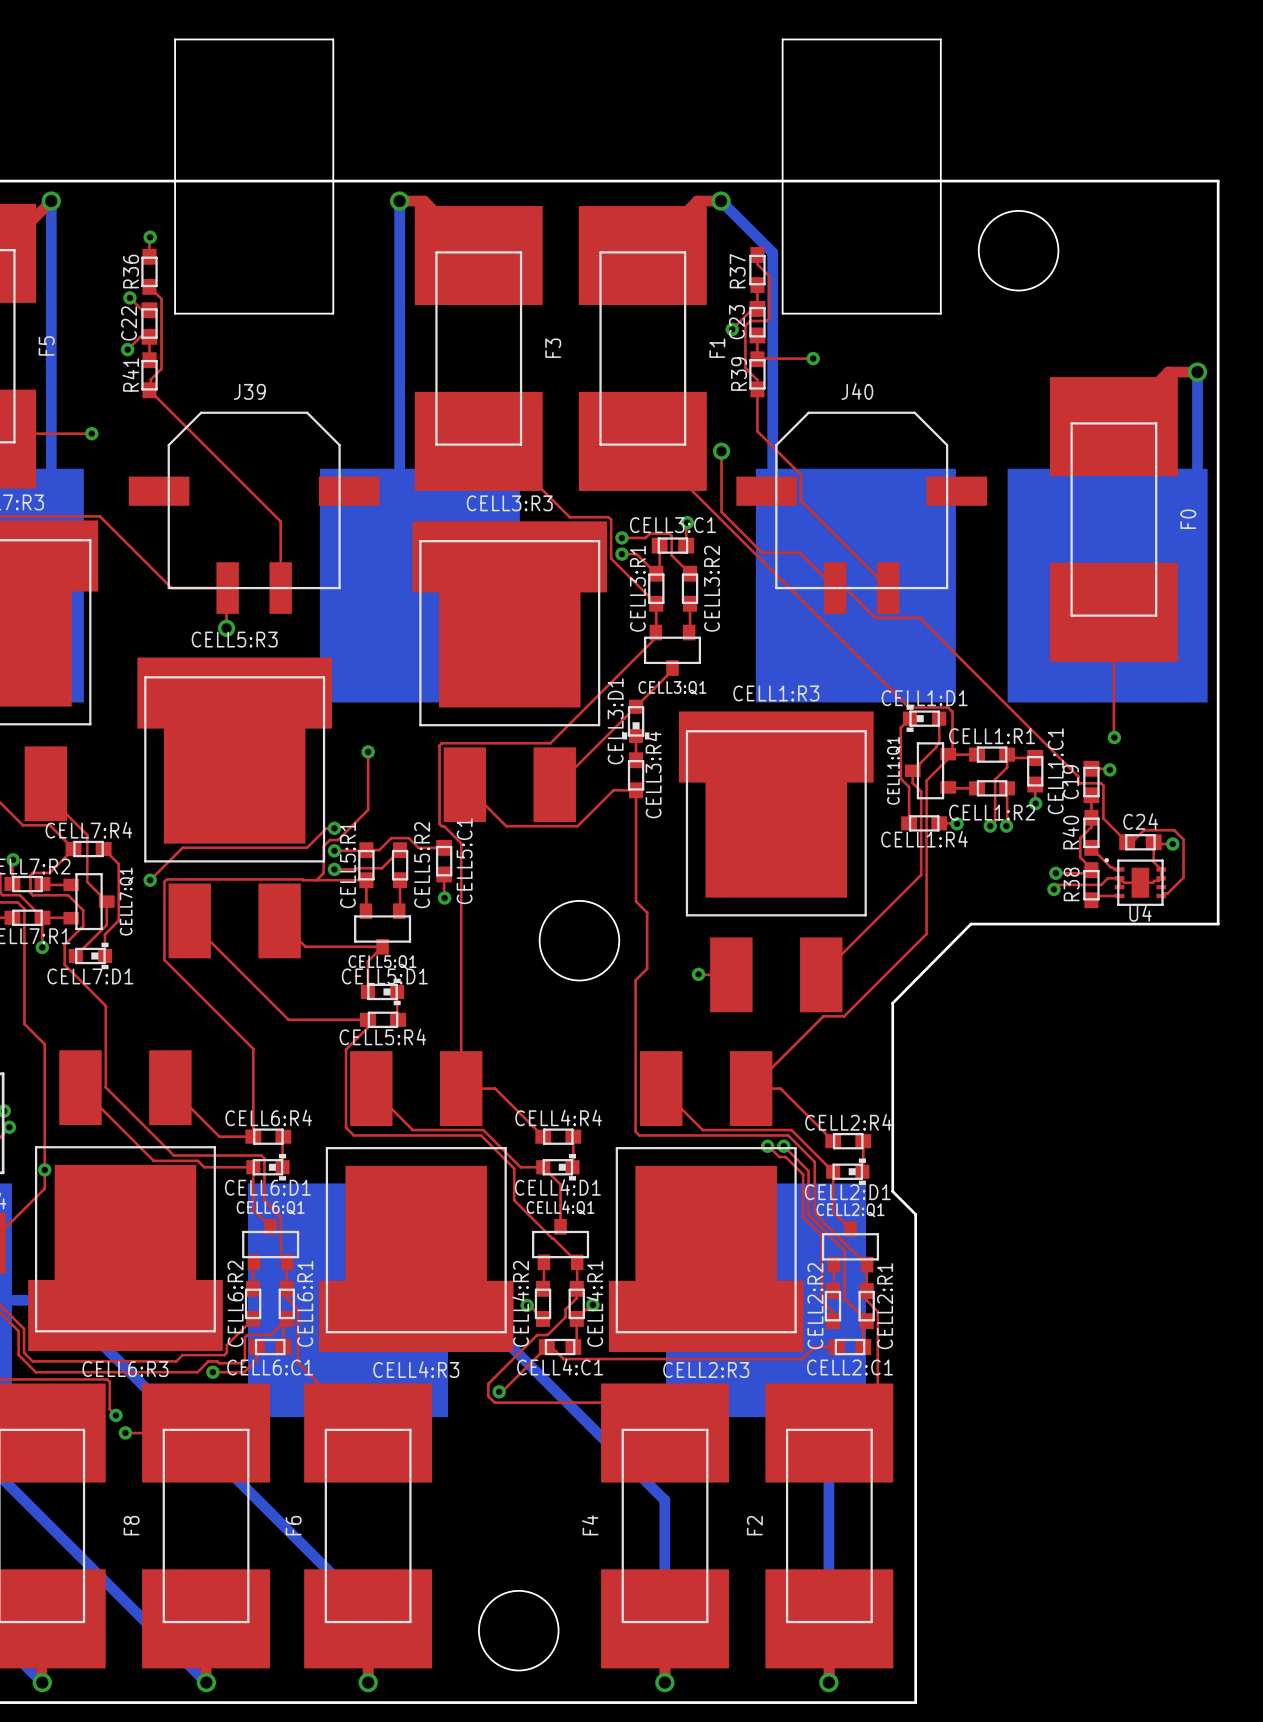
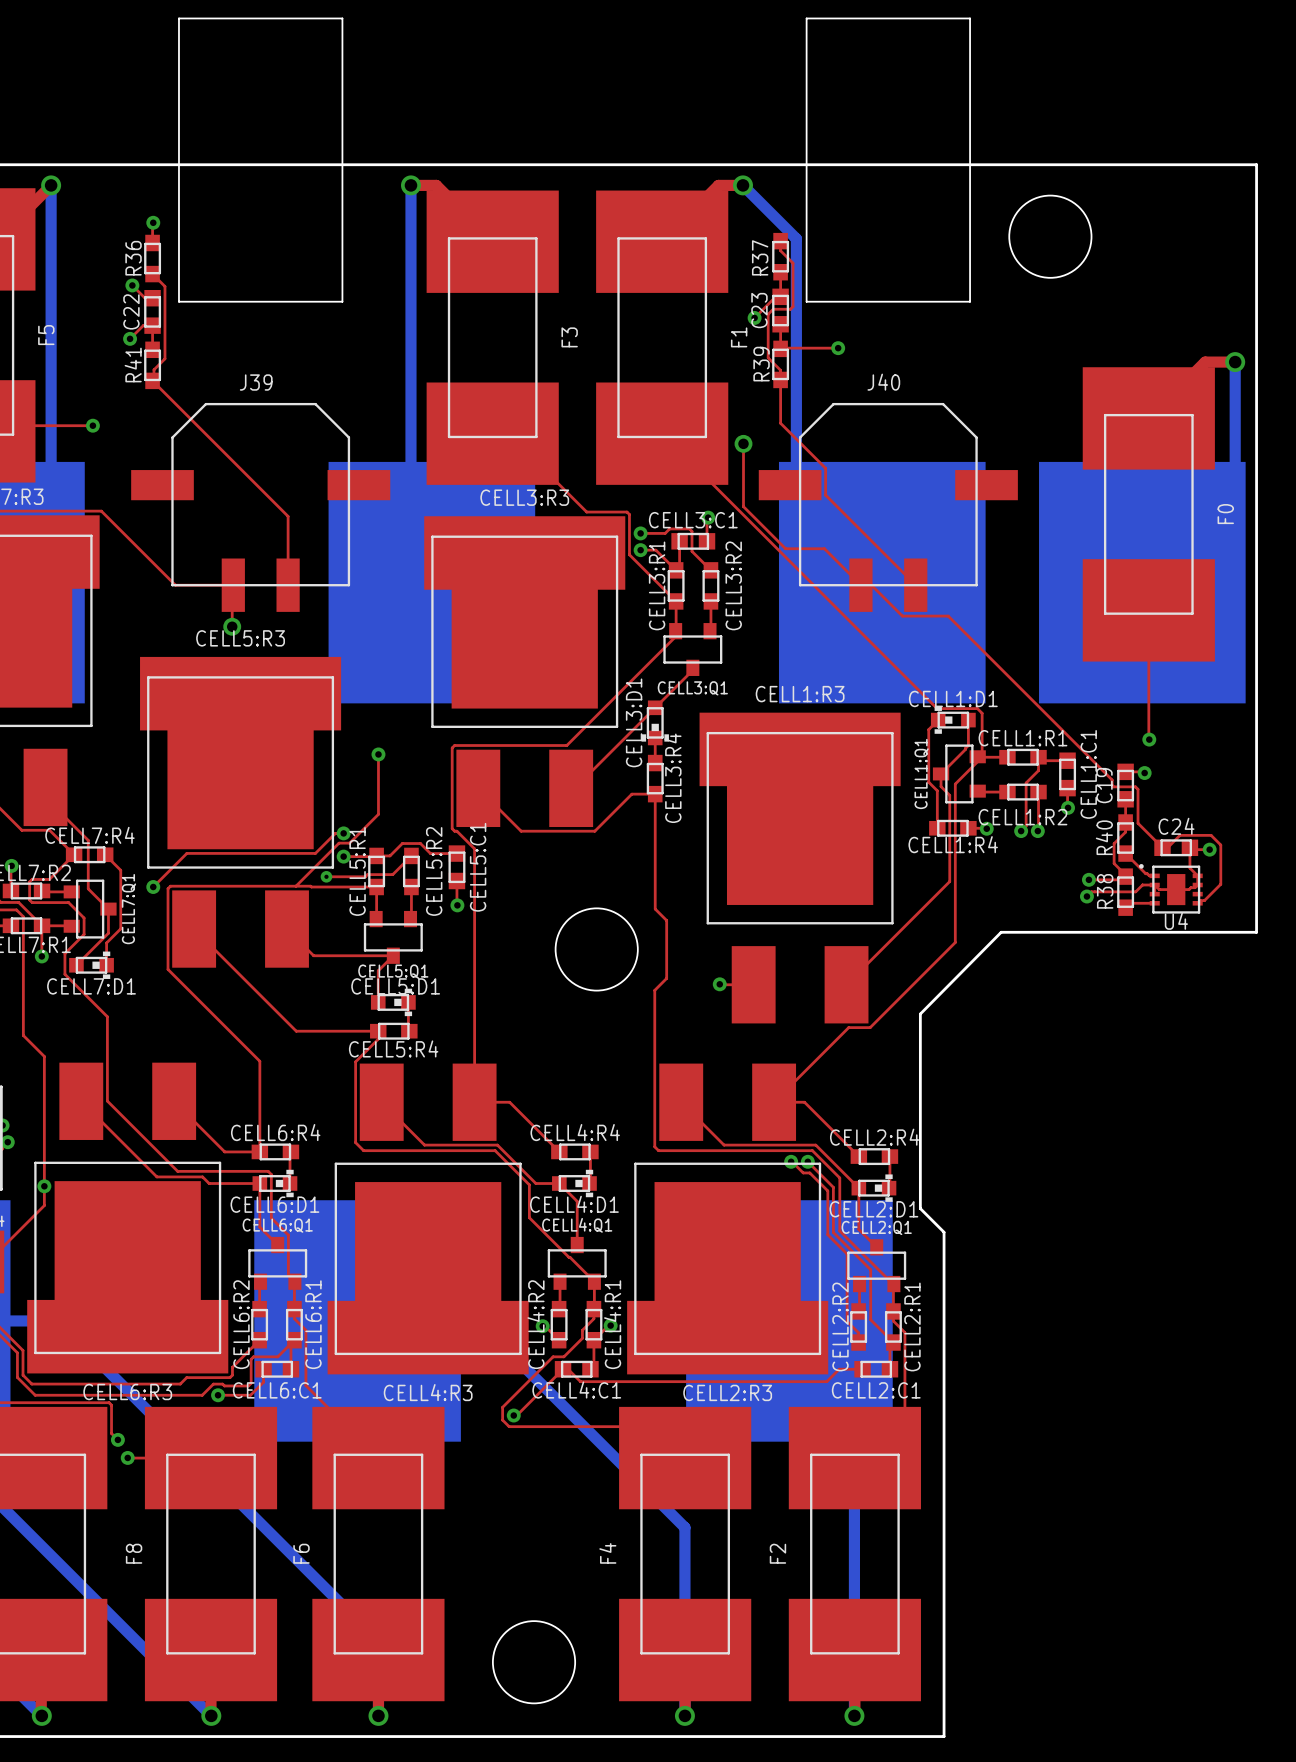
top track: (340, 837) (338, 840) (330, 840) (323, 846) (323, 873) (316, 880) -> (349, 843) (339, 843) (295, 886)
top track: (334, 869) (356, 869) -> (326, 876) (366, 875)
via: (334, 869) -> none
via: none -> (326, 876)

